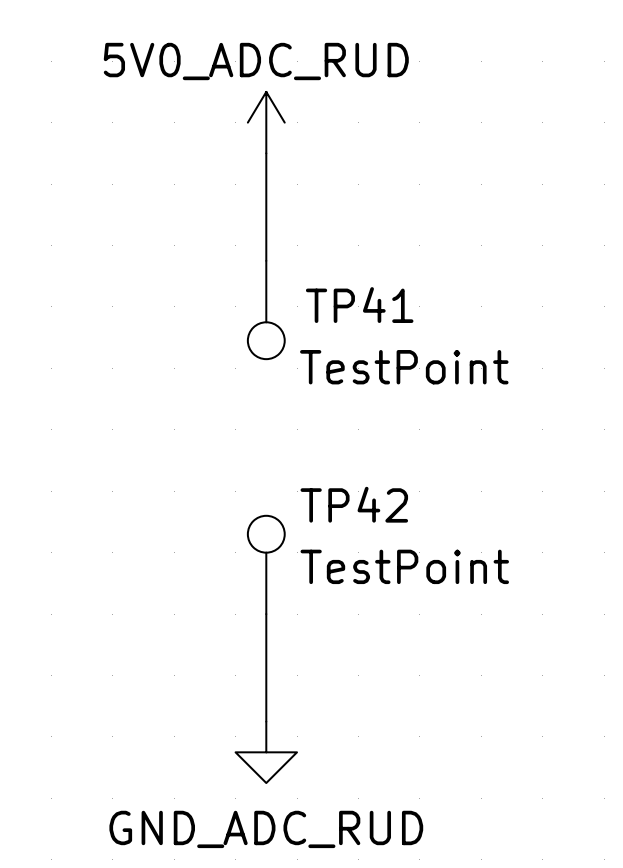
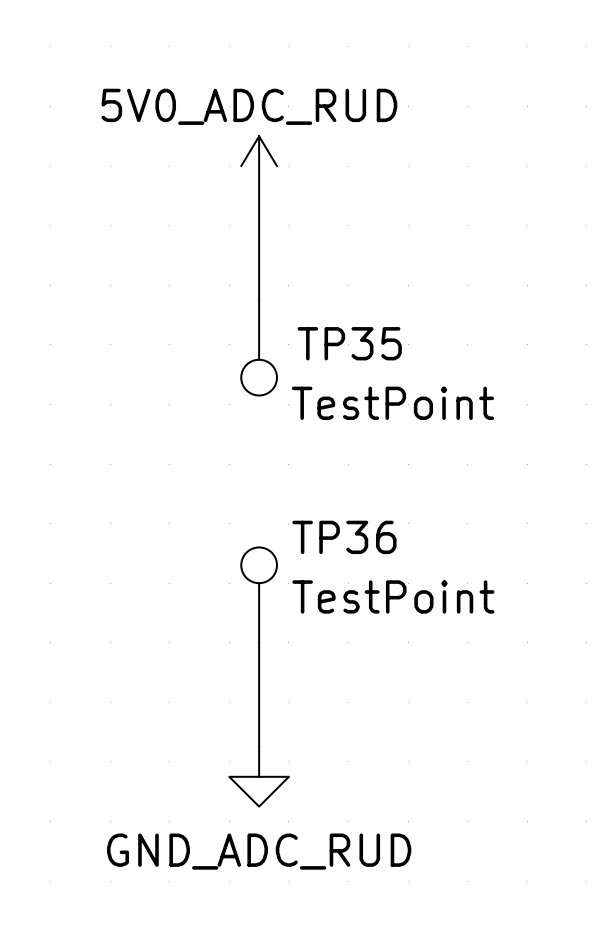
TP41 name: TP41 (359, 305) -> TP35 (349, 343)
TP42 name: TP42 (354, 504) -> TP36 (344, 537)

